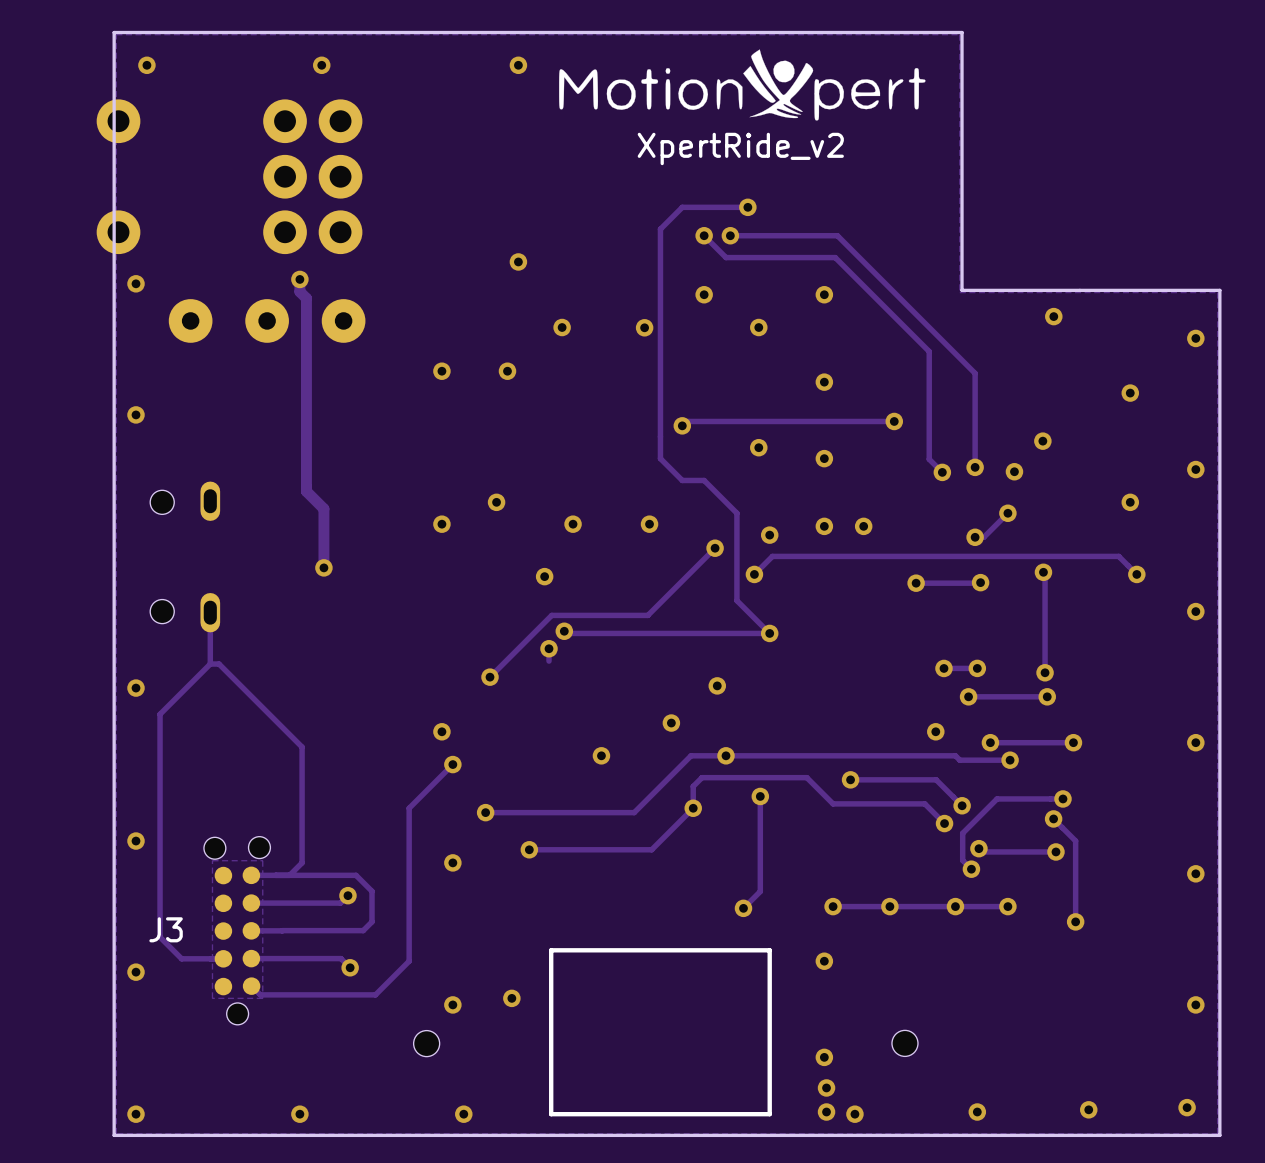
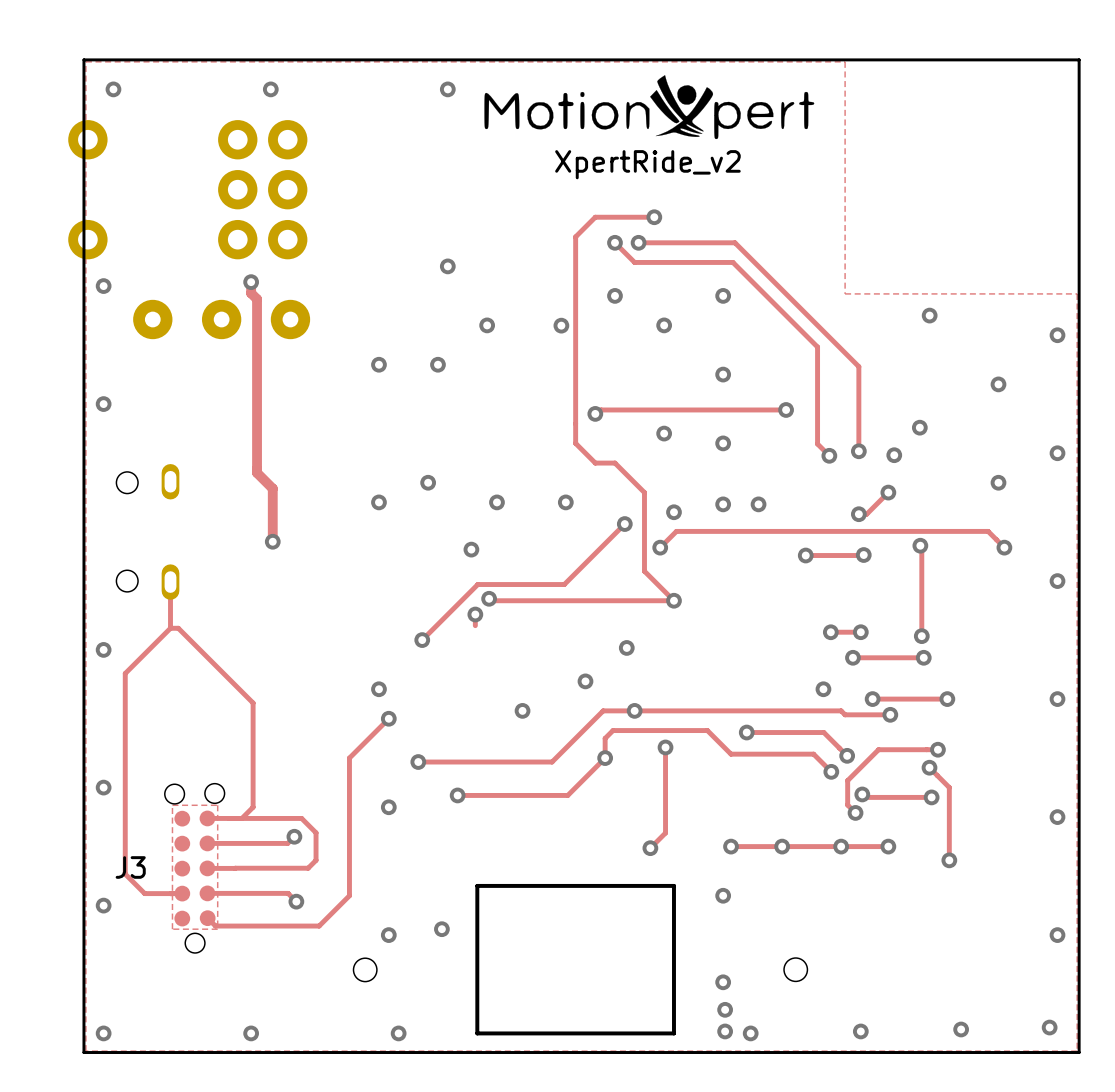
board edge: (962, 32) (962, 290) (1219, 290) -> (847, 59) (1079, 59) (1079, 291)

